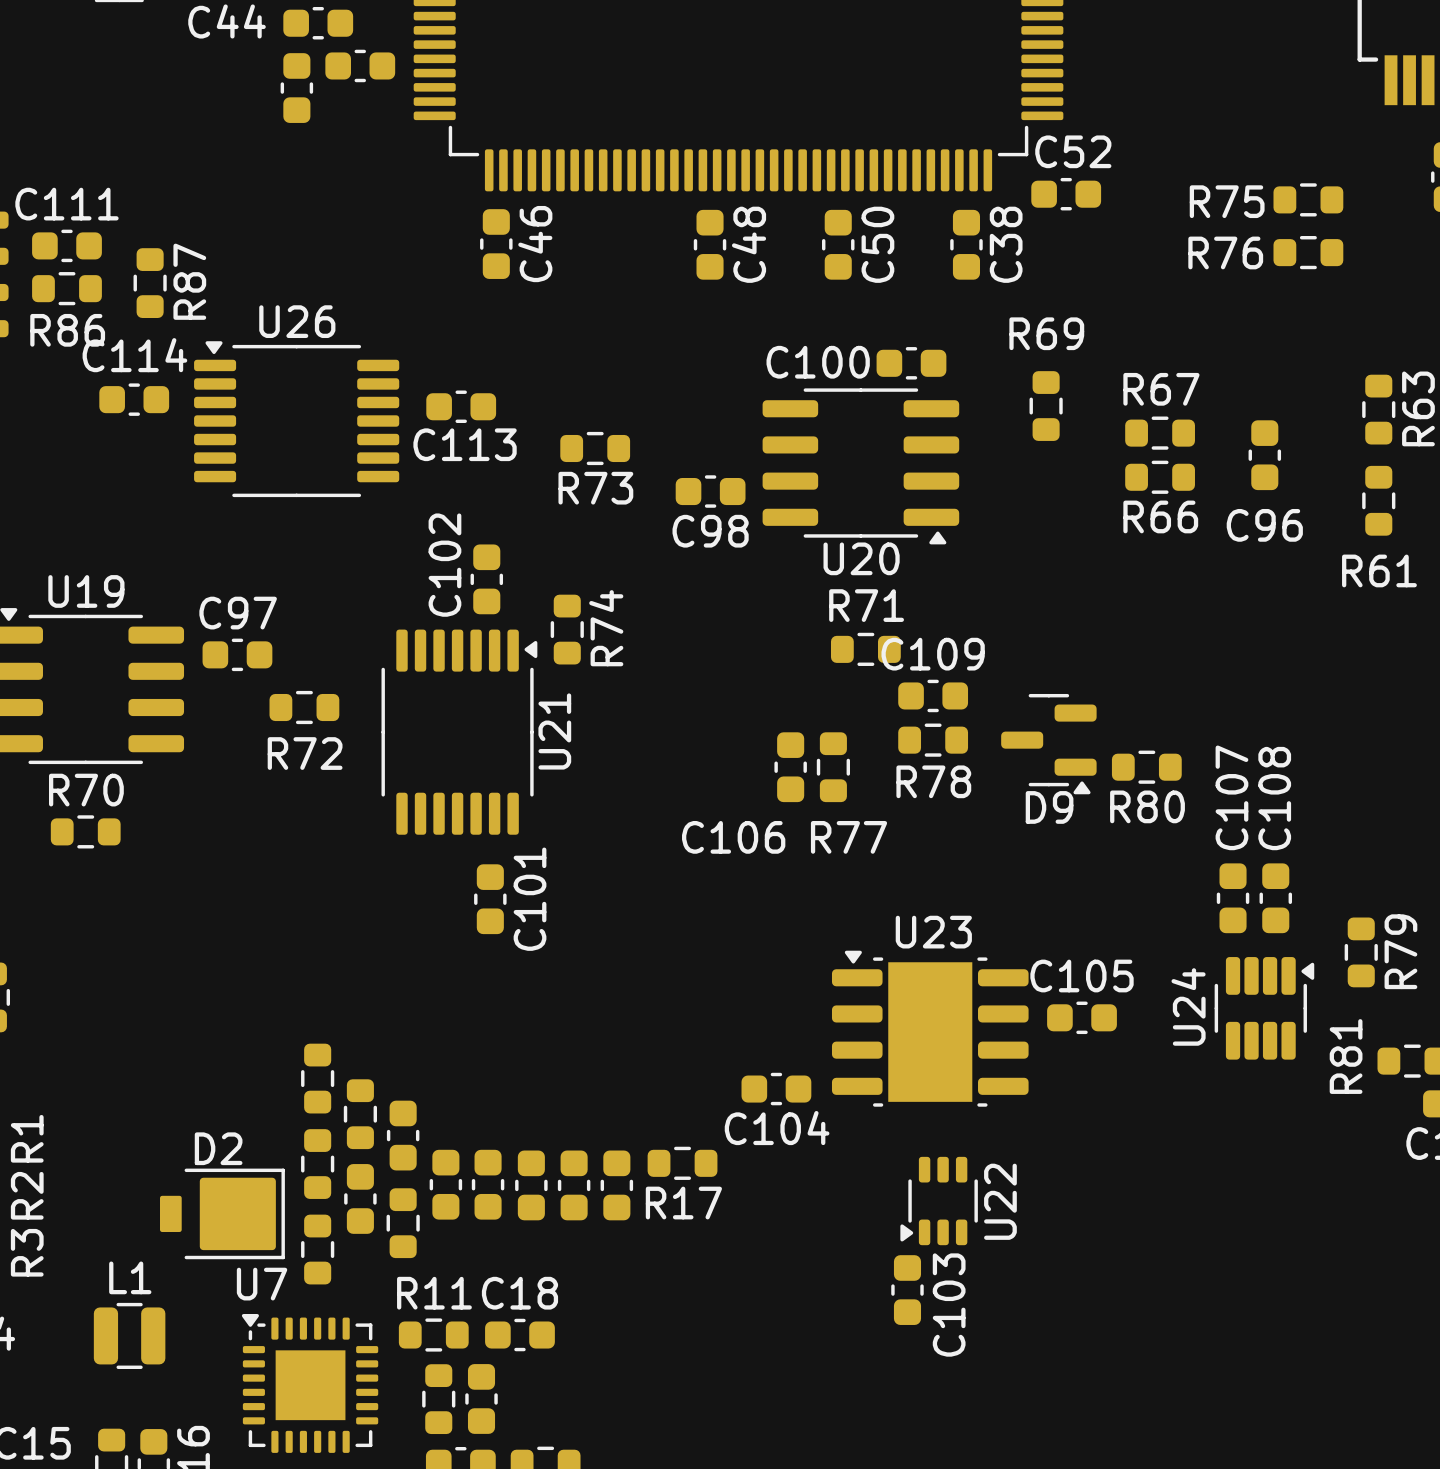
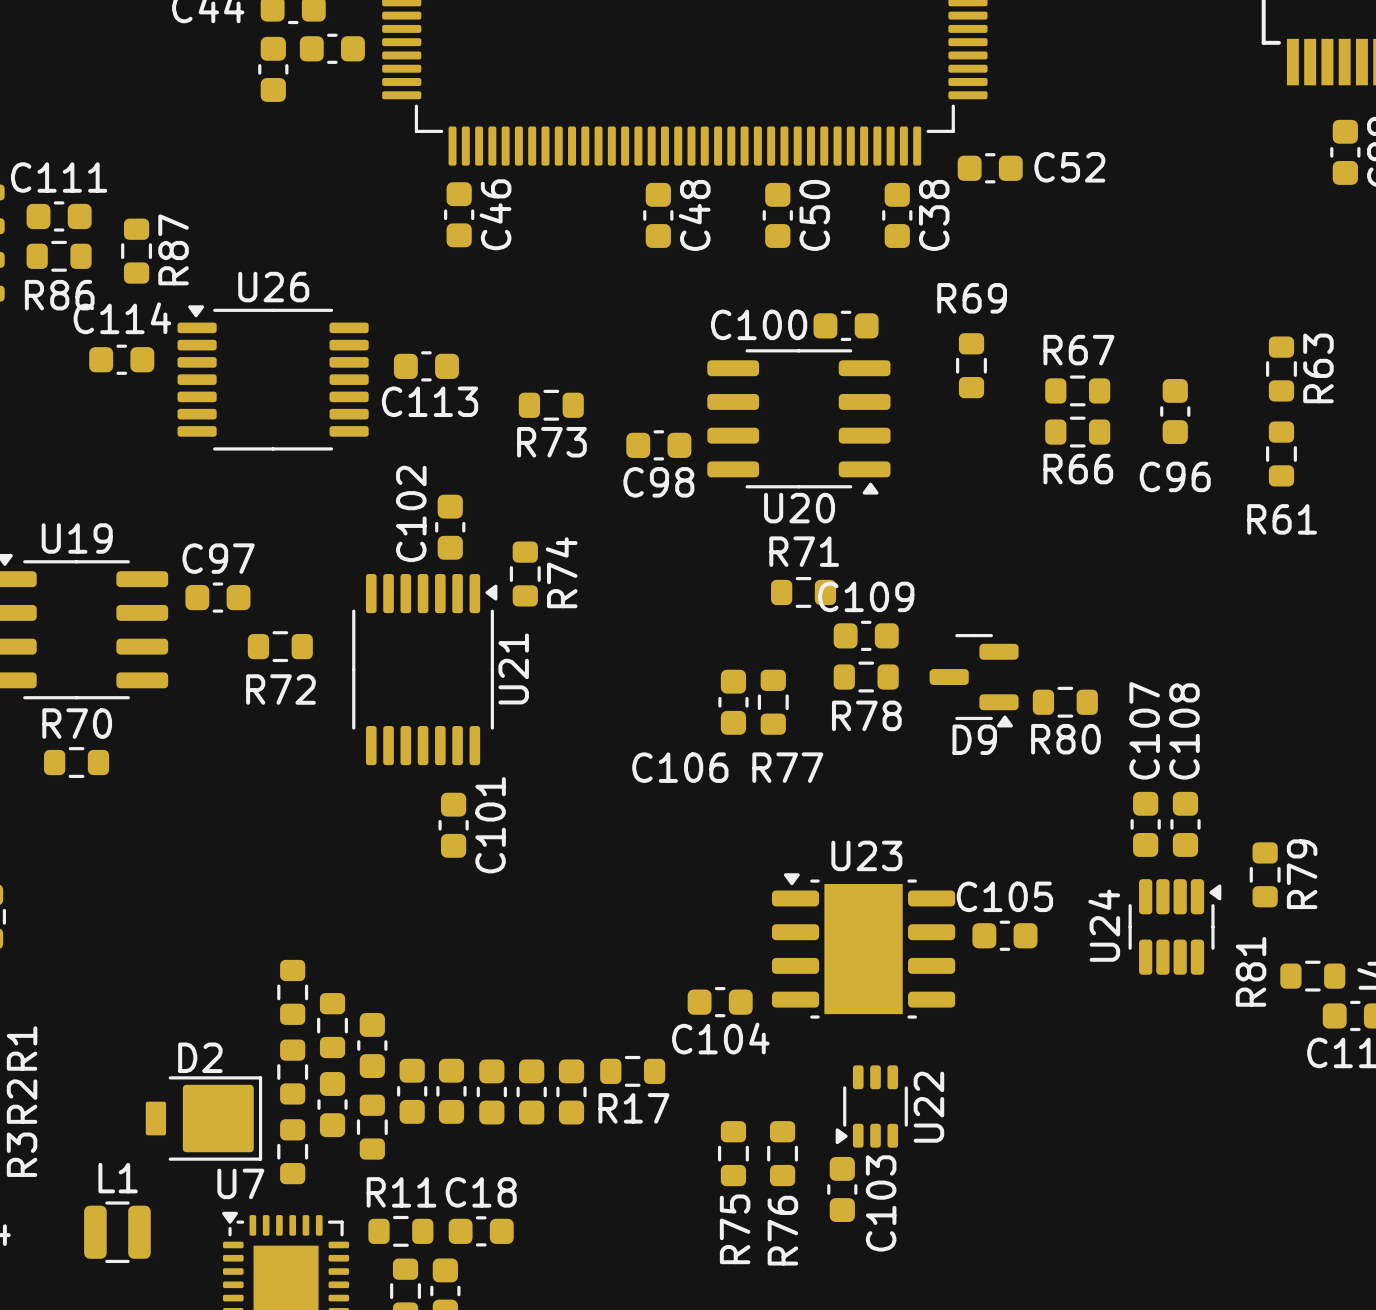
C52 name position: C52 (1073, 151) -> C52 (1069, 167)
R75 rotation: 0° (1308, 199) -> 90° clockwise (733, 1153)
R75 position: (1308, 199) -> (733, 1153)
R75 name position: R75 (1227, 201) -> R75 (735, 1229)
R76 name position: R76 (1225, 252) -> R76 (782, 1230)
R76 rotation: 0° (1308, 252) -> 90° clockwise (782, 1153)
R76 position: (1308, 252) -> (782, 1153)

